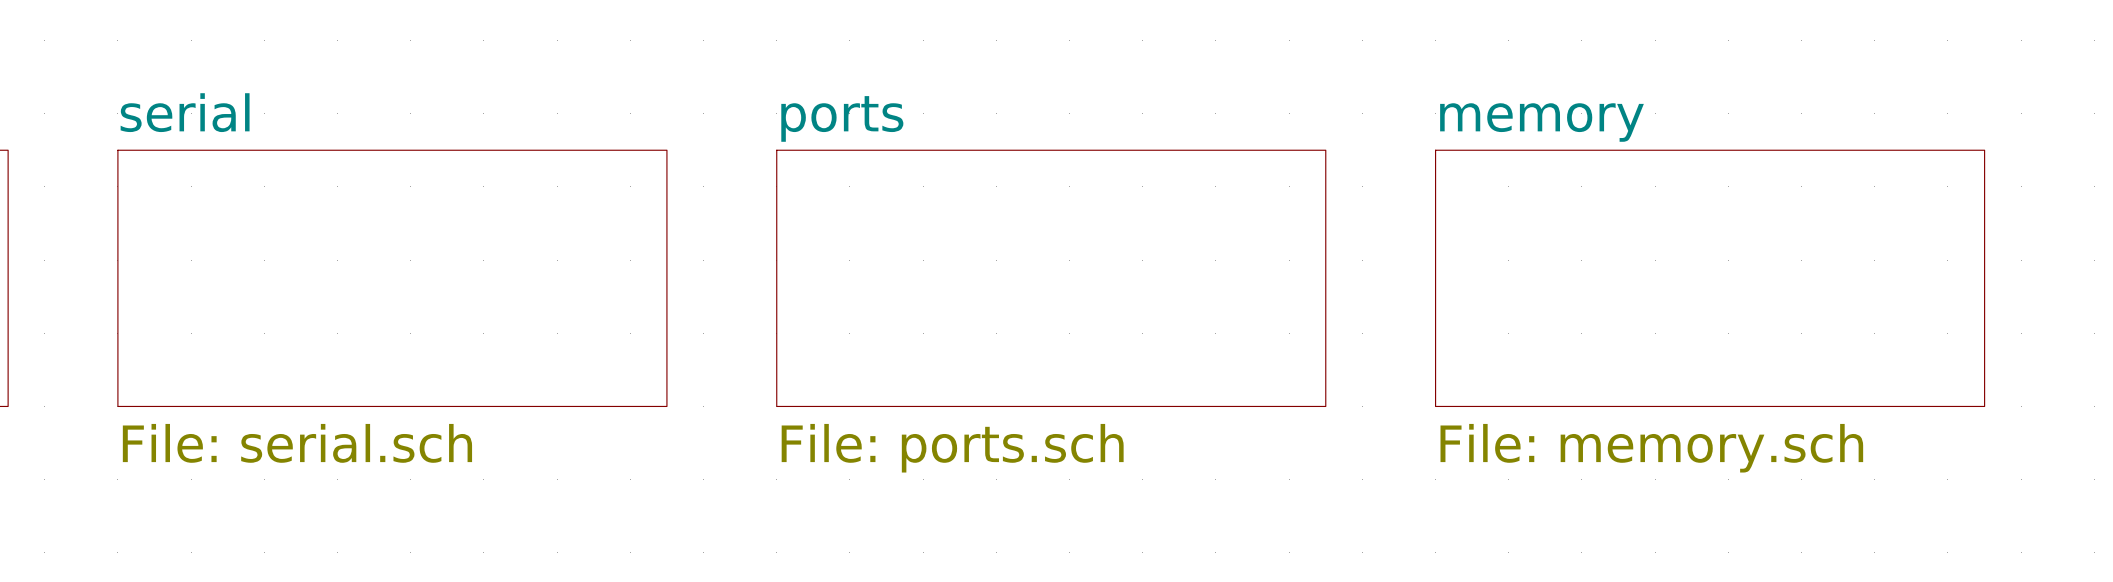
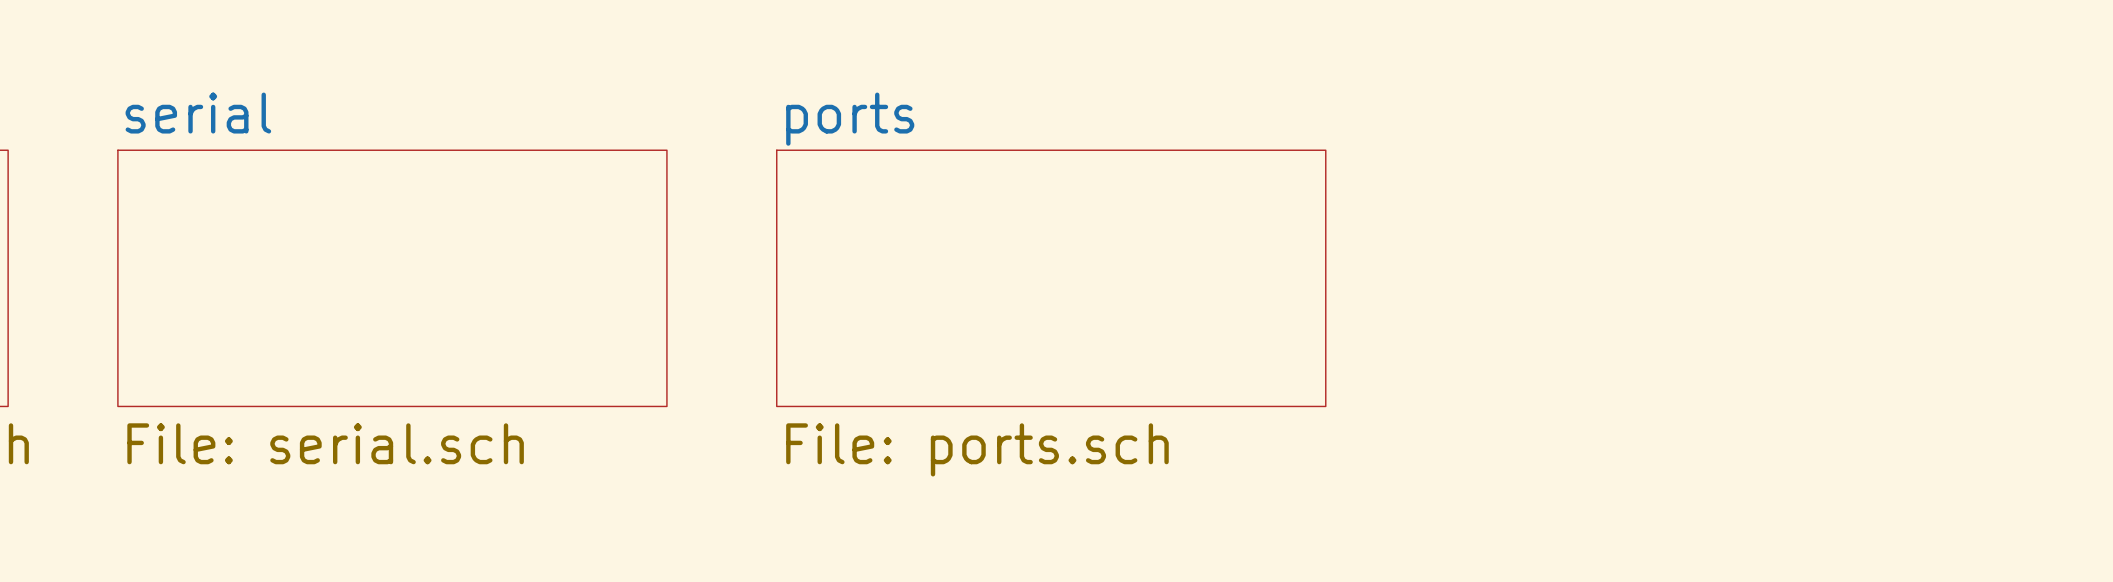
sheet memory: File: memory.sch (1710, 278) -> none

